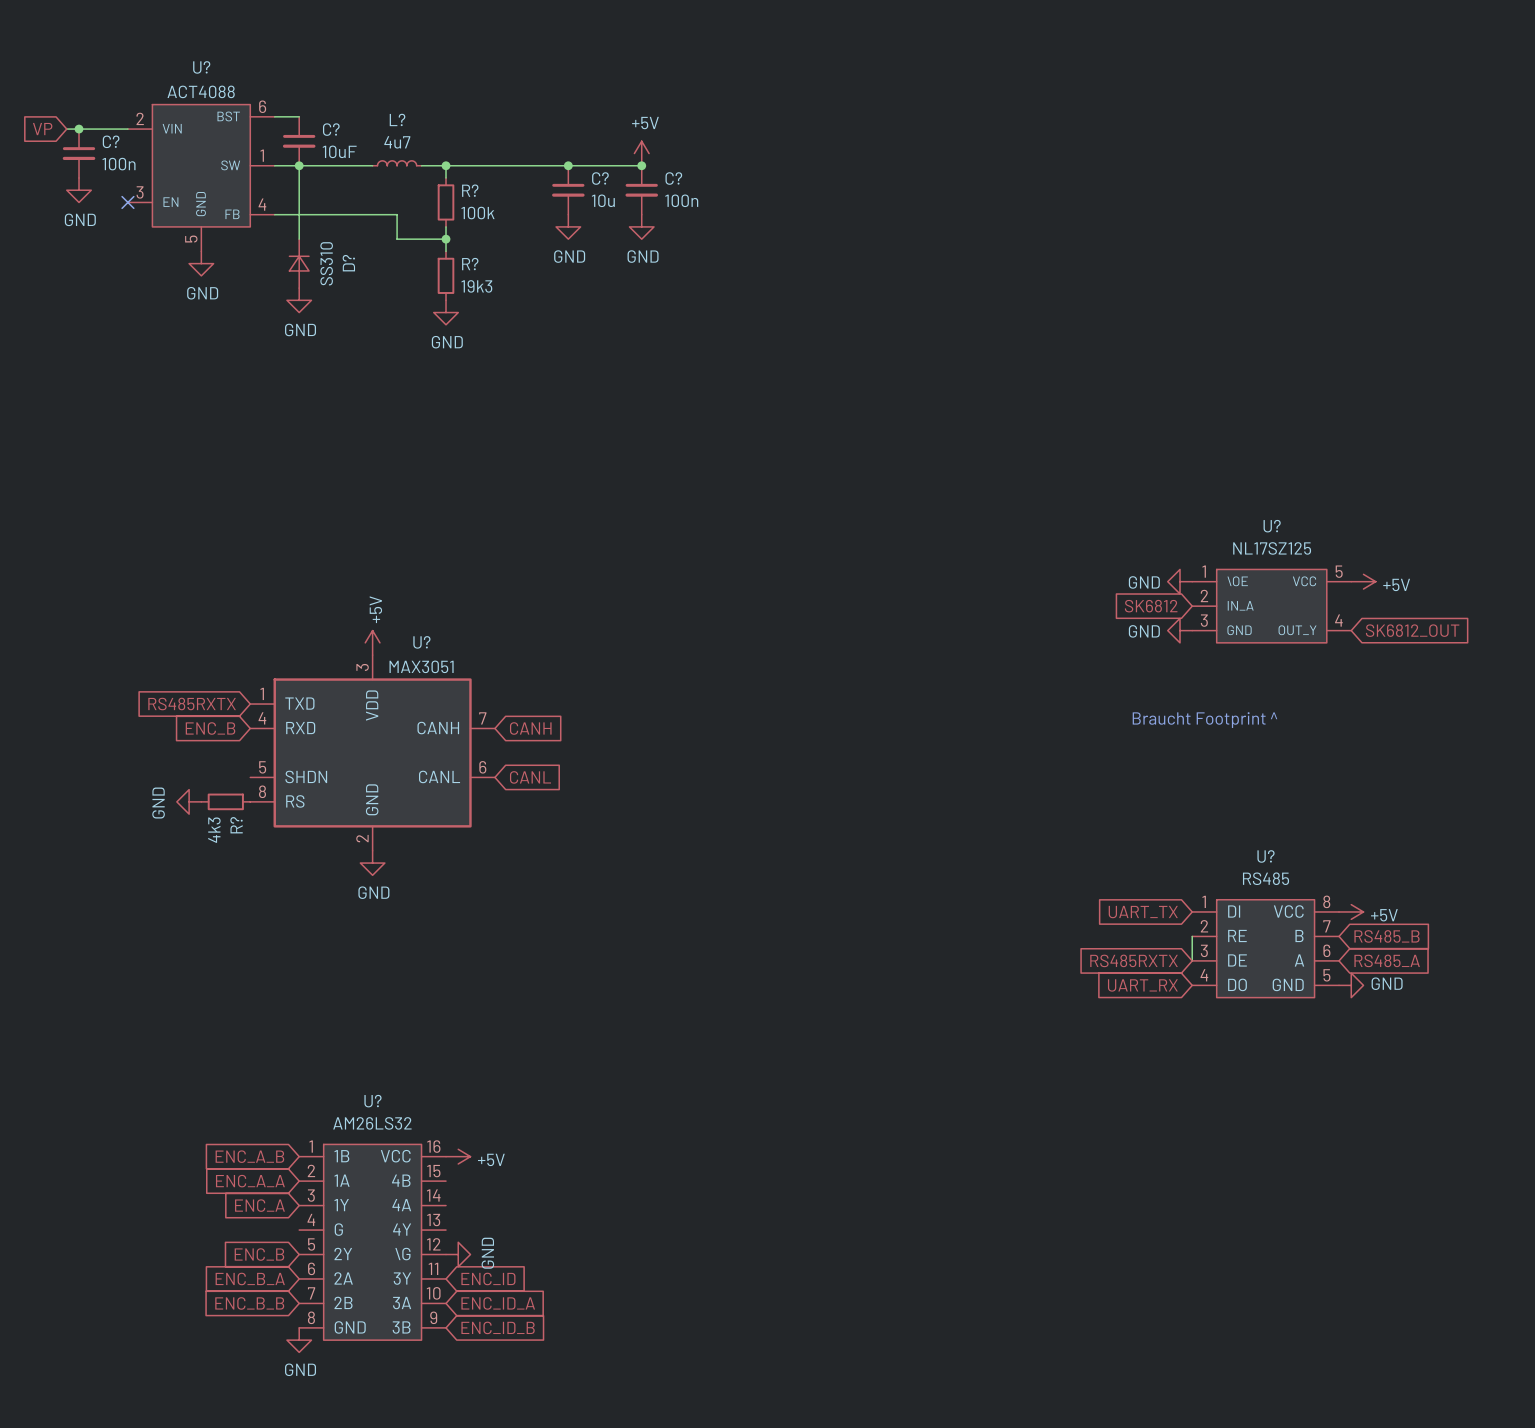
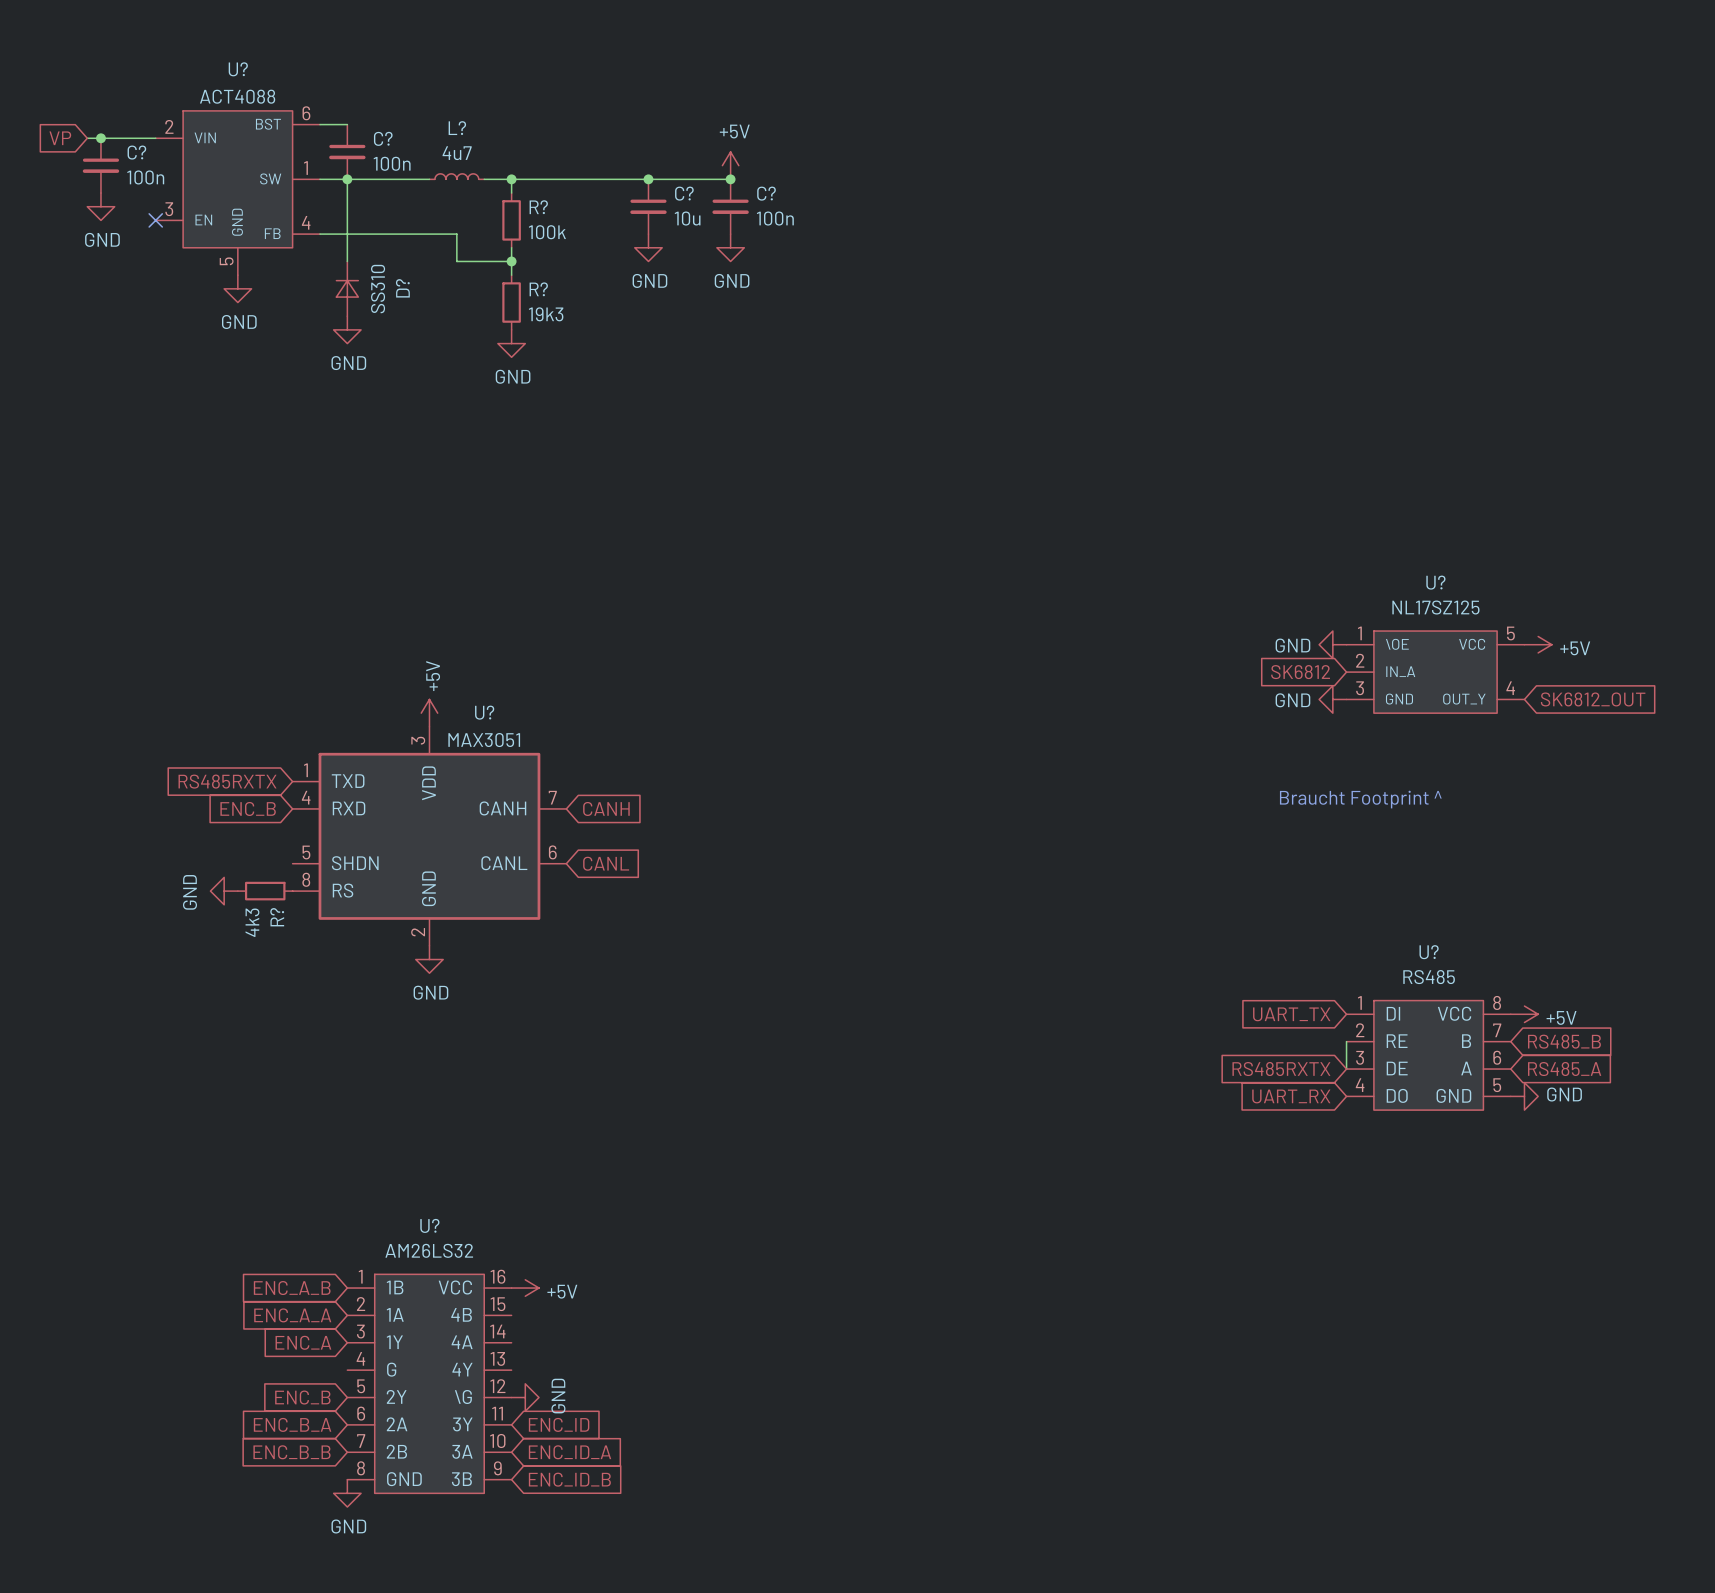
C? value: 10uF (339, 151) -> 100n (392, 163)

